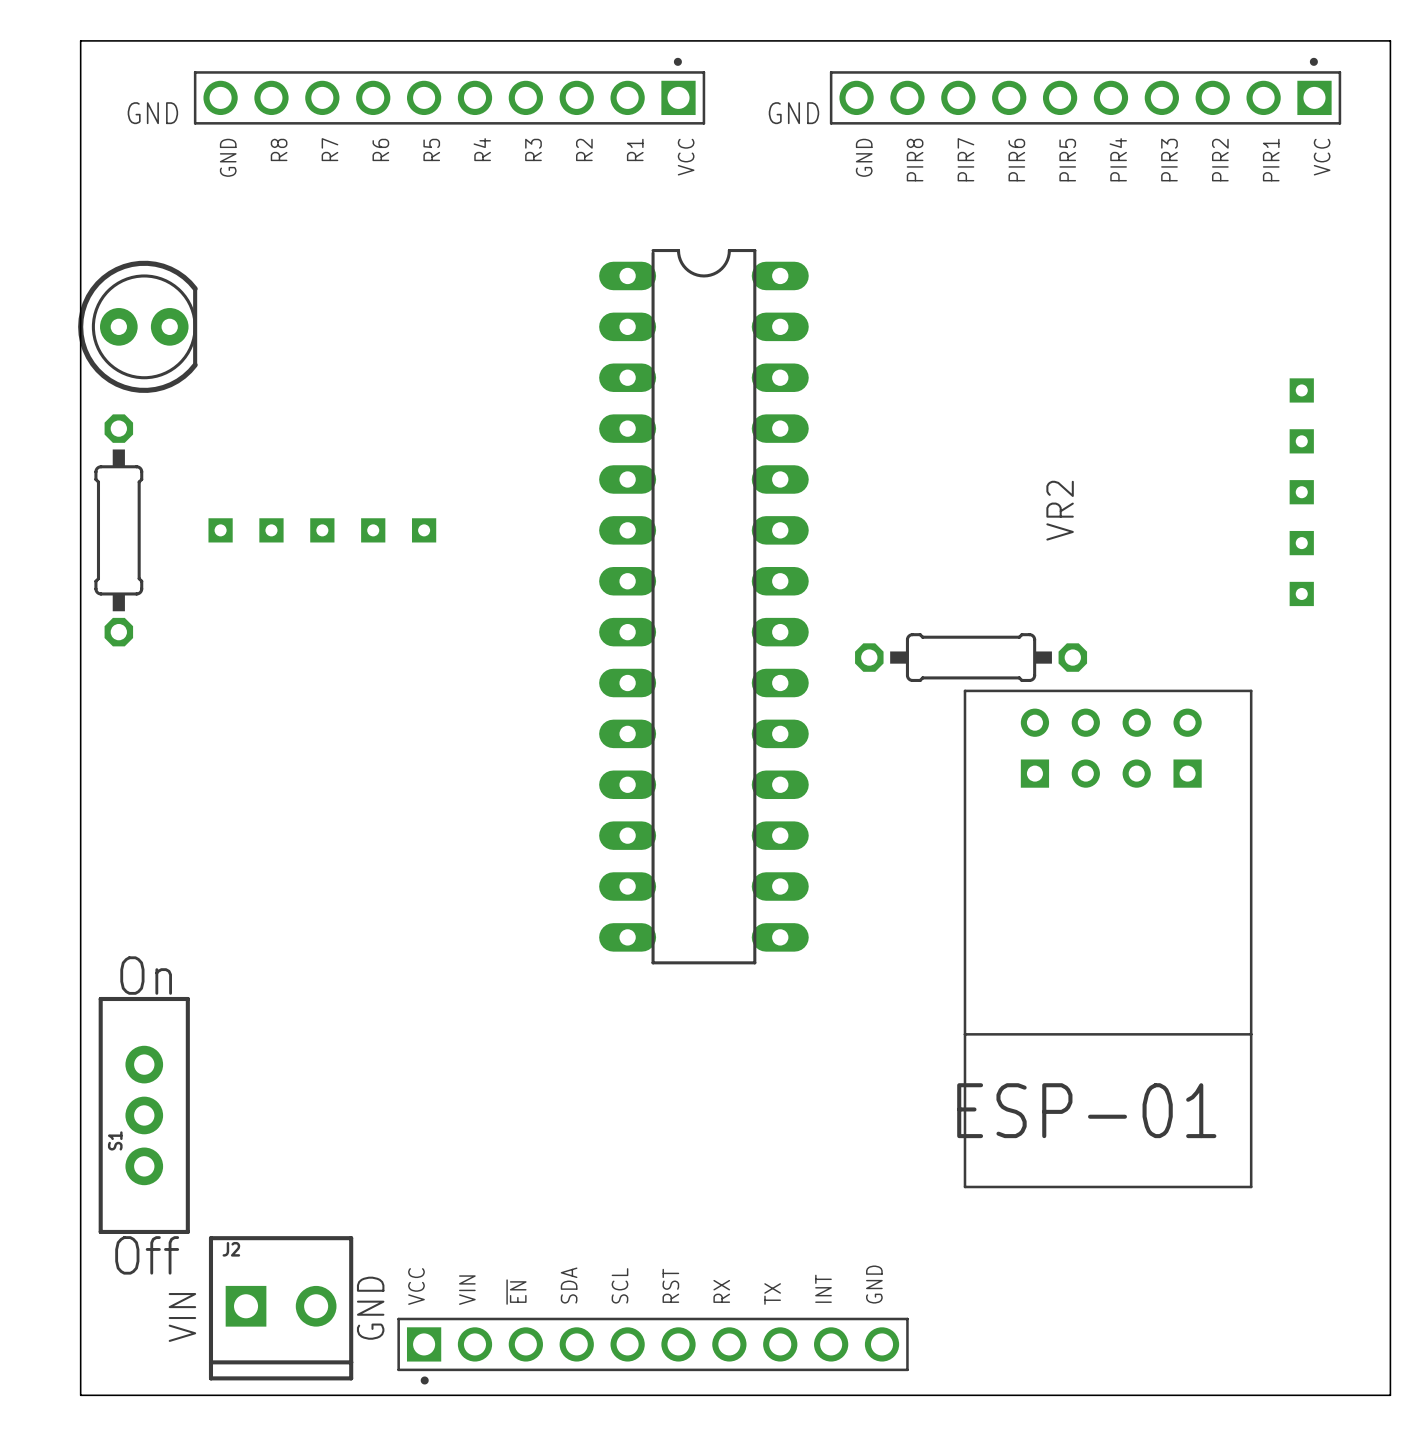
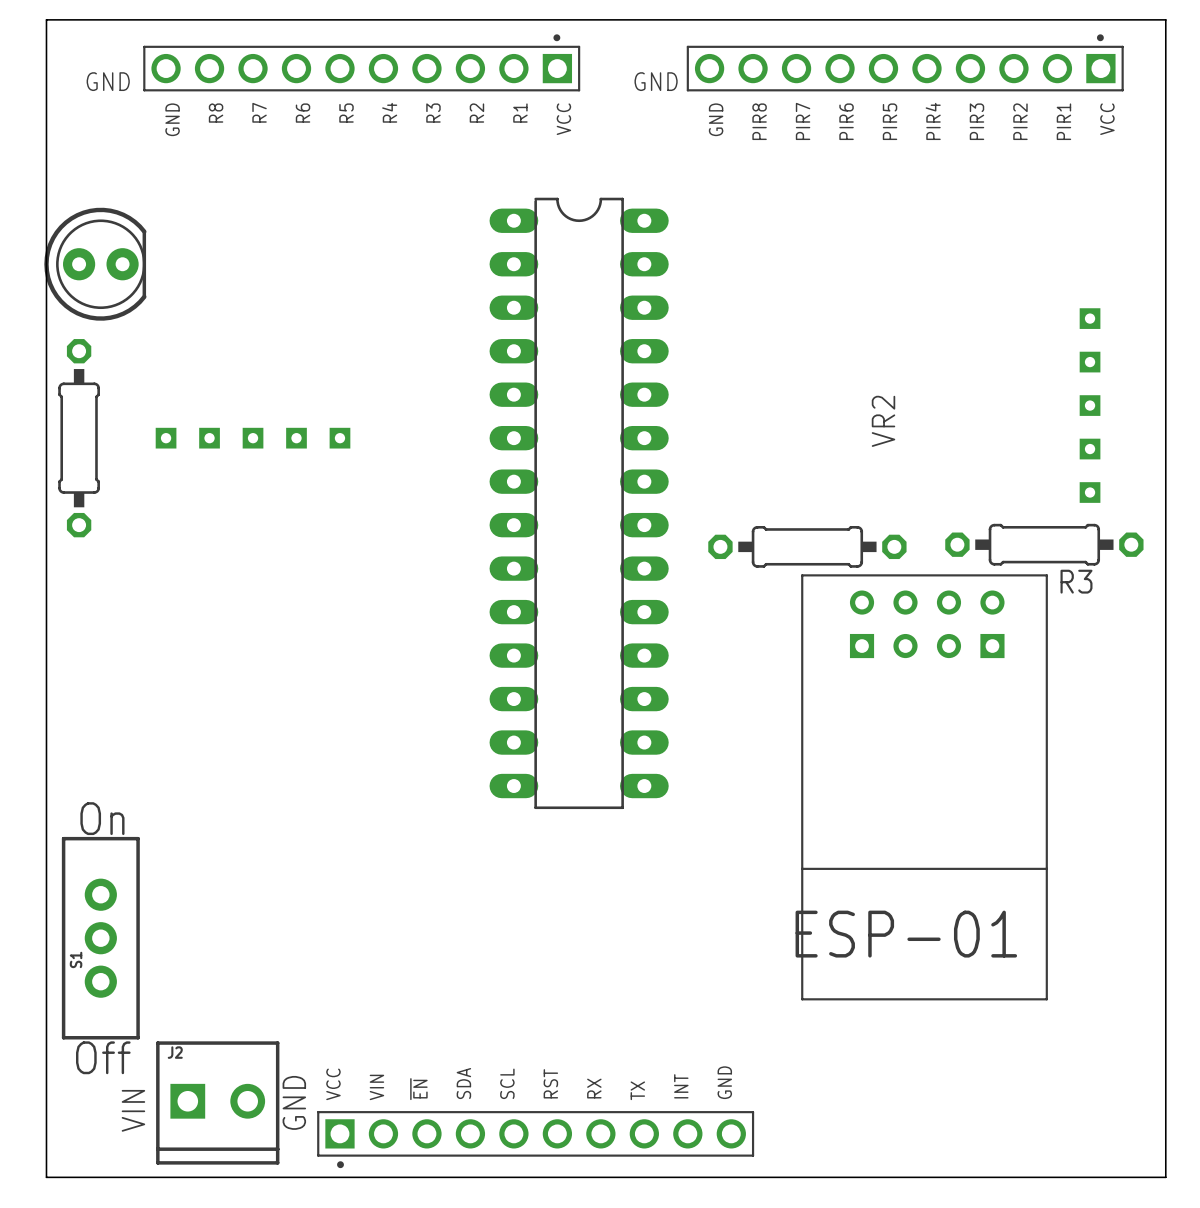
R3: none -> (1044, 544)

